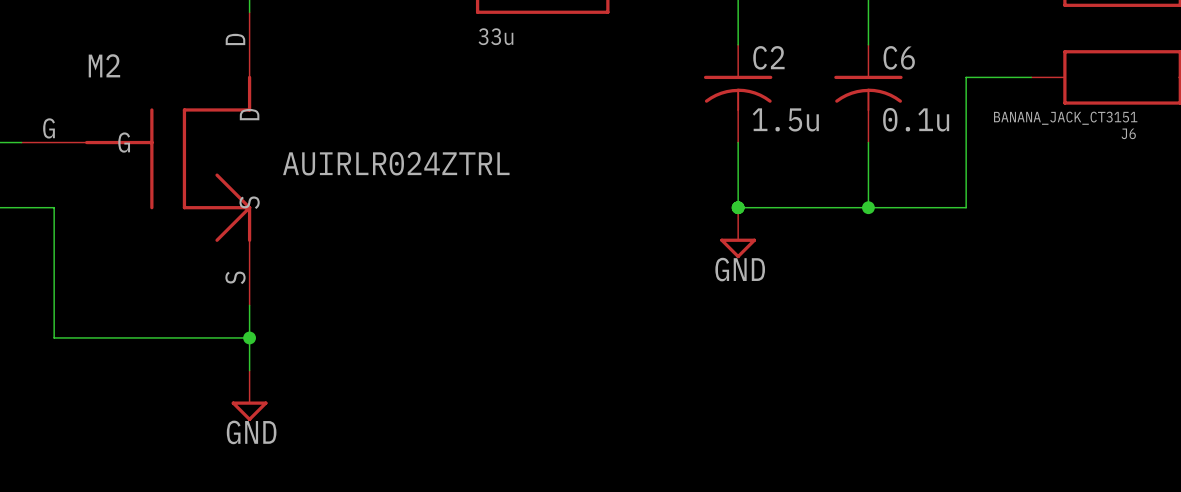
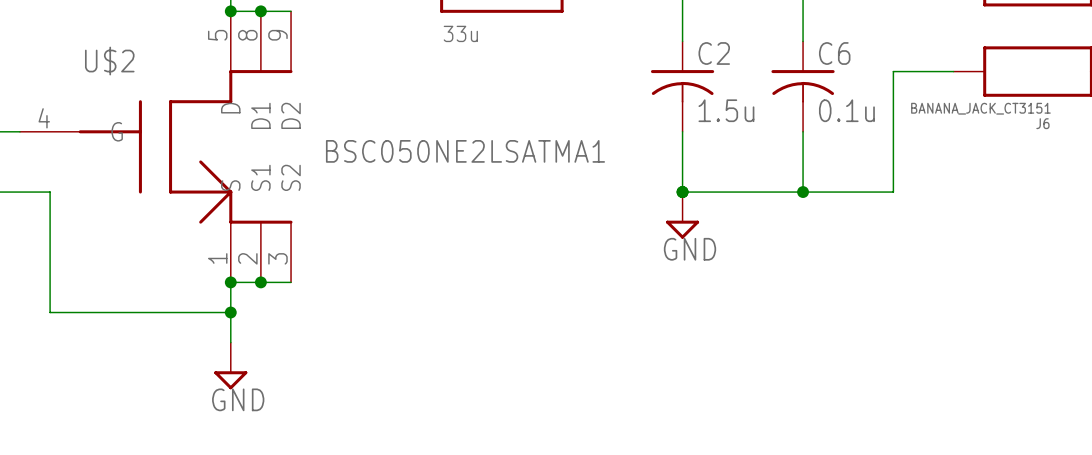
wire: none -> (230, 11) (291, 11)
junction: none -> (230, 11)
junction: none -> (260, 11)
M2: AUIRLR024ZTRL (136, 158) -> none
U$2: none -> BSC050NE2LSATMA1 (156, 146)
wire: none -> (230, 282) (291, 282)
junction: none -> (230, 282)
junction: none -> (260, 282)

